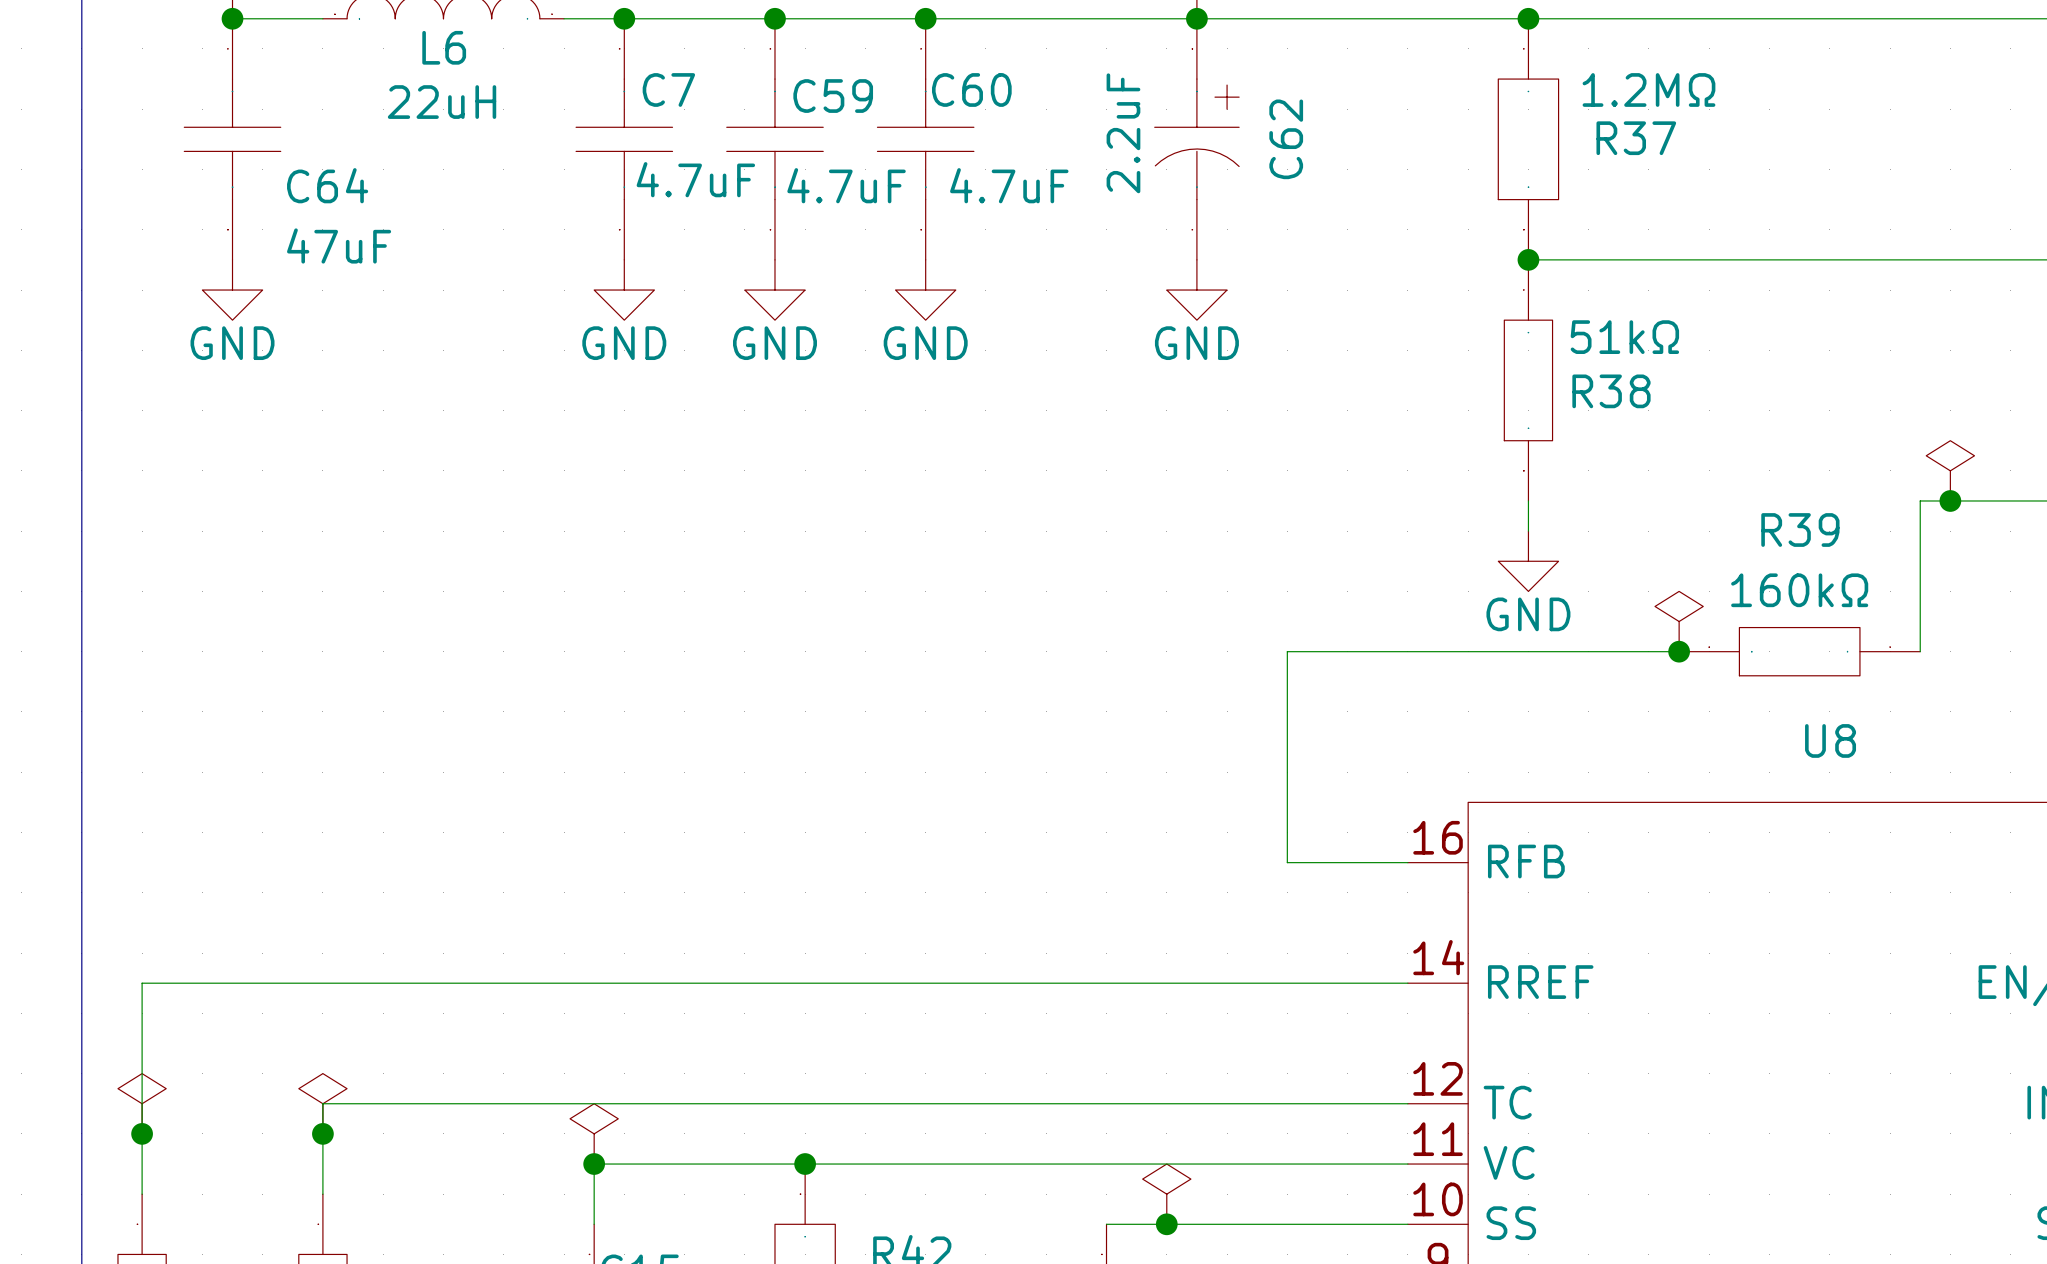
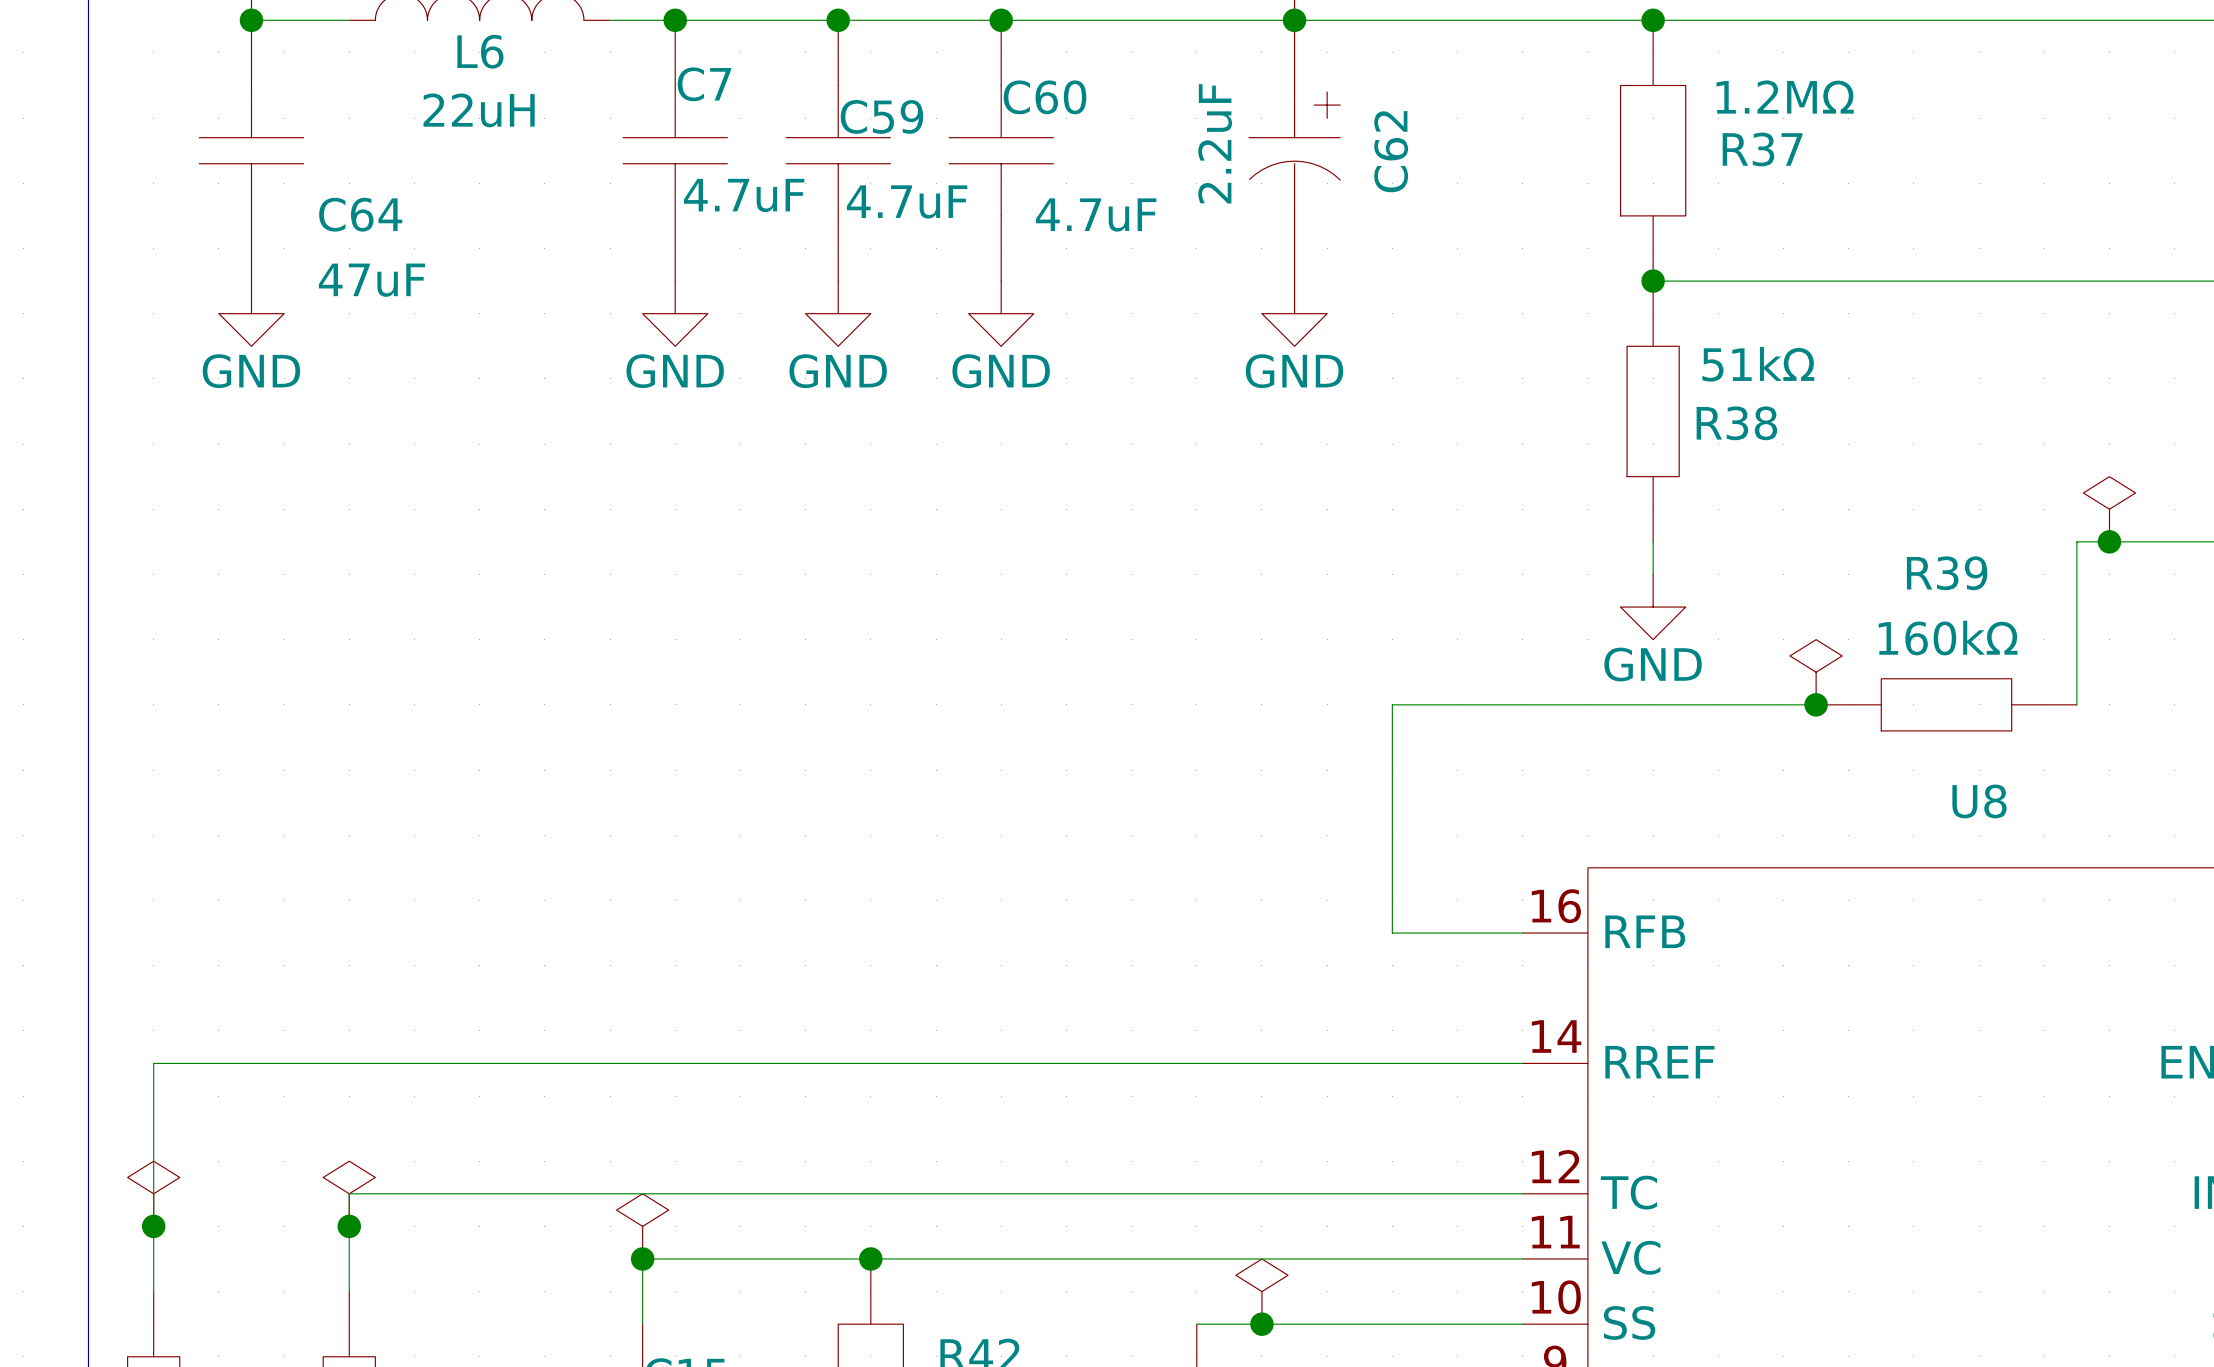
C7 name position: C7 (668, 89) -> C7 (704, 84)
C59 name position: C59 (833, 96) -> C59 (881, 116)
C64 name position: C64 (327, 185) -> C64 (360, 214)
C60 value position: 4.7uF (1009, 185) -> 4.7uF (1096, 214)
C64 value position: 47uF (339, 245) -> 47uF (371, 280)

